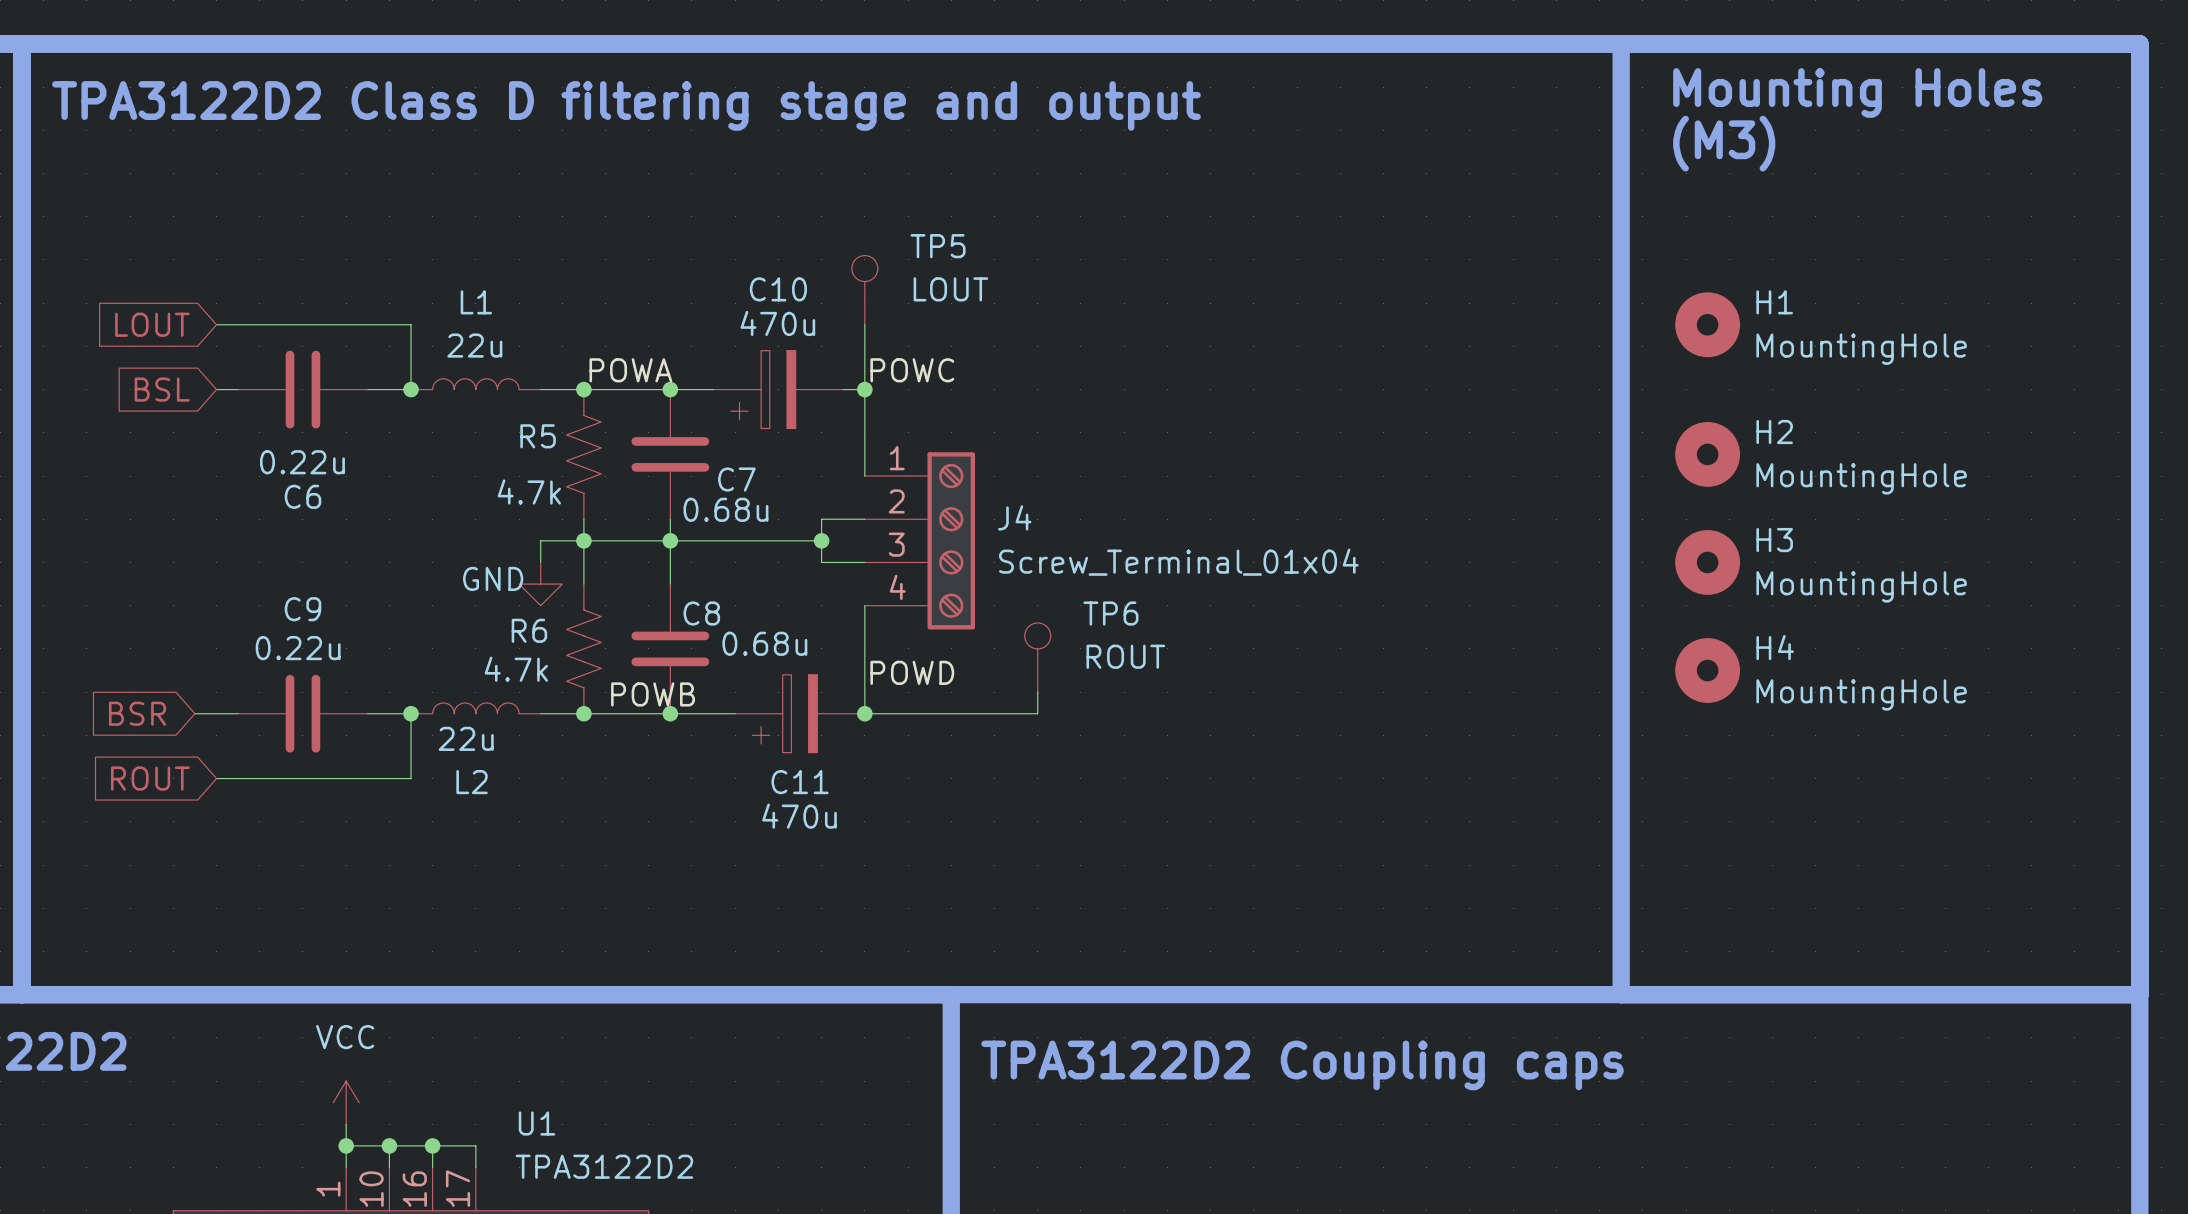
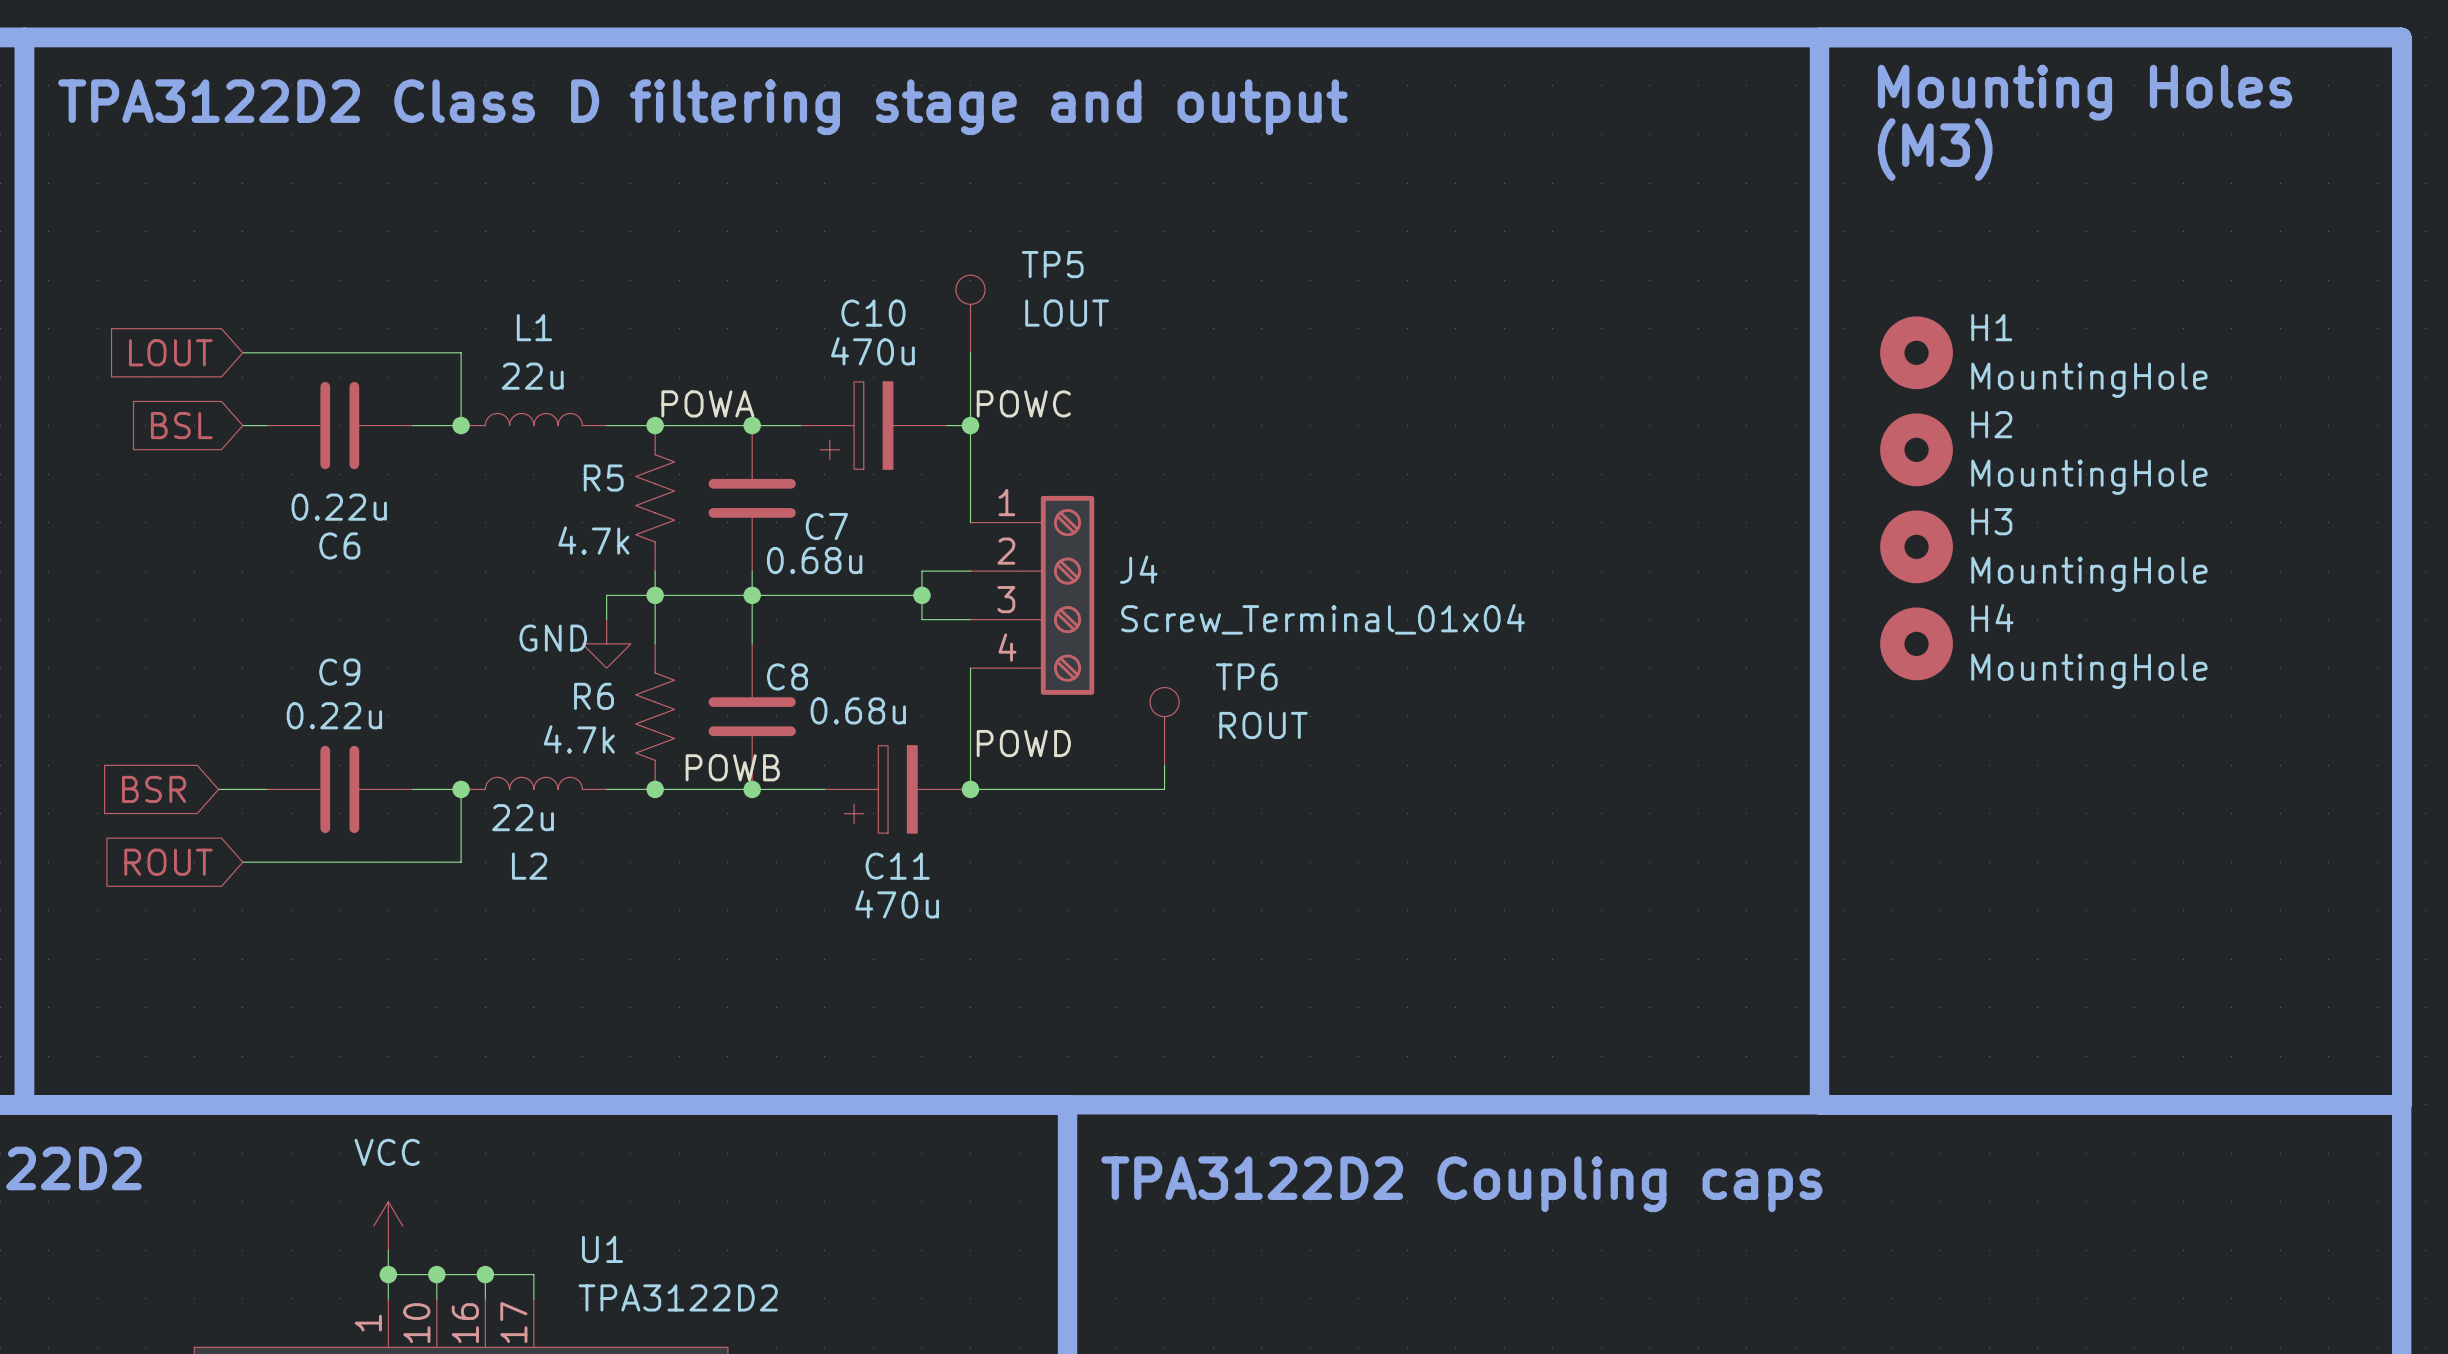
H2 position: (1707, 454) -> (1916, 449)
H3 position: (1707, 562) -> (1916, 546)
H4 position: (1707, 670) -> (1916, 643)

